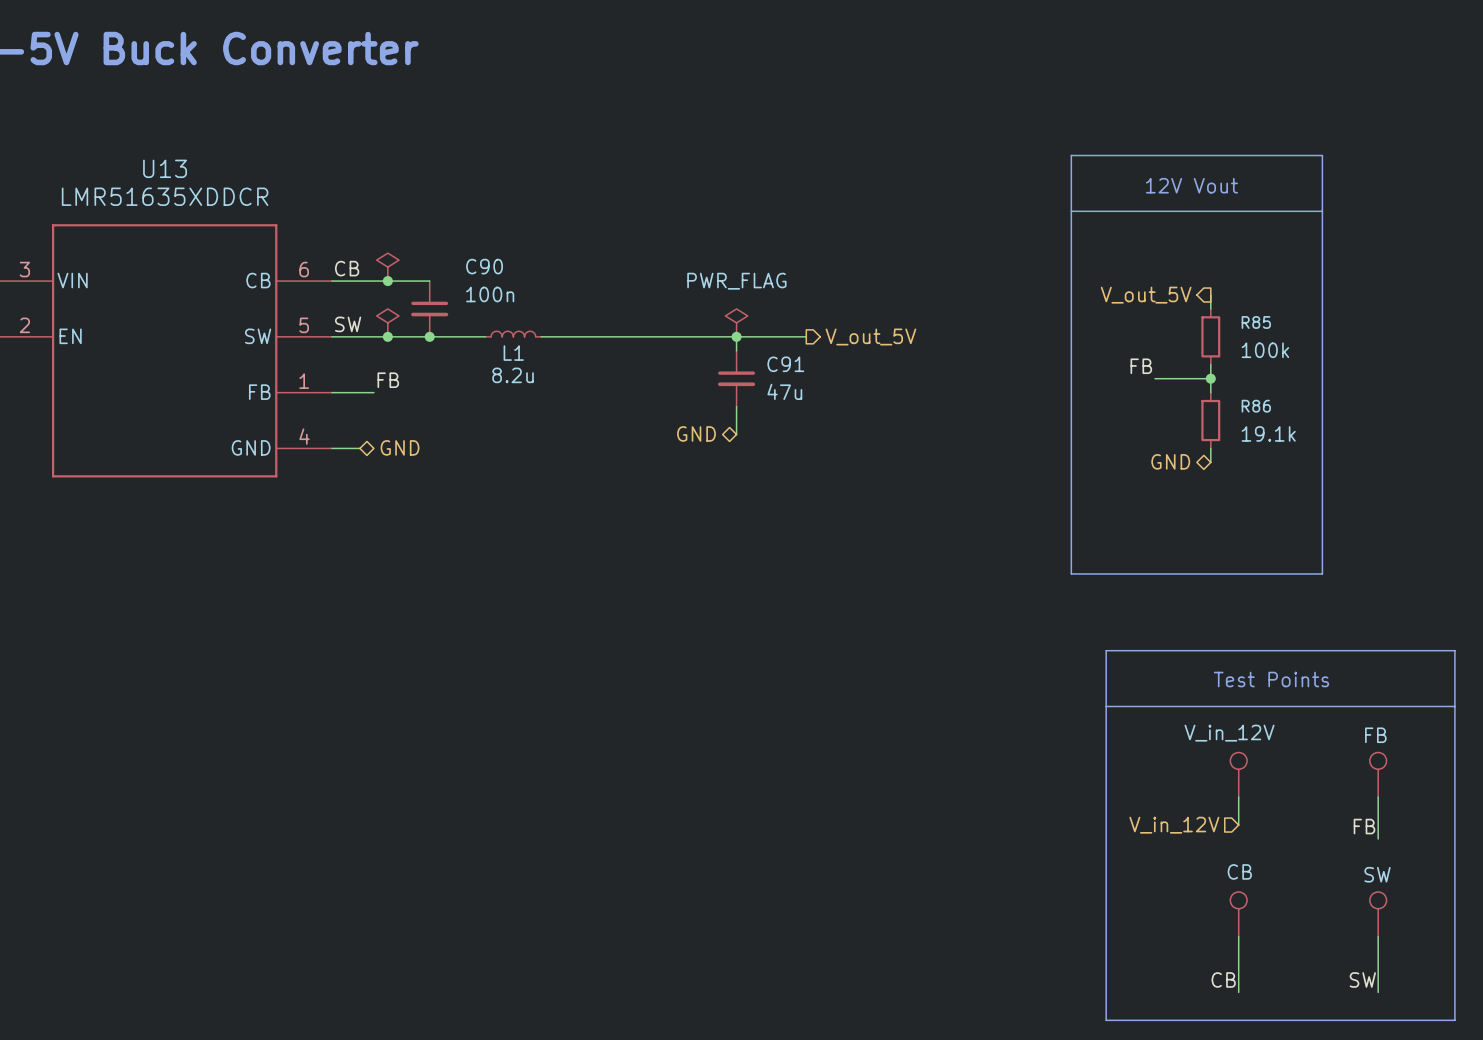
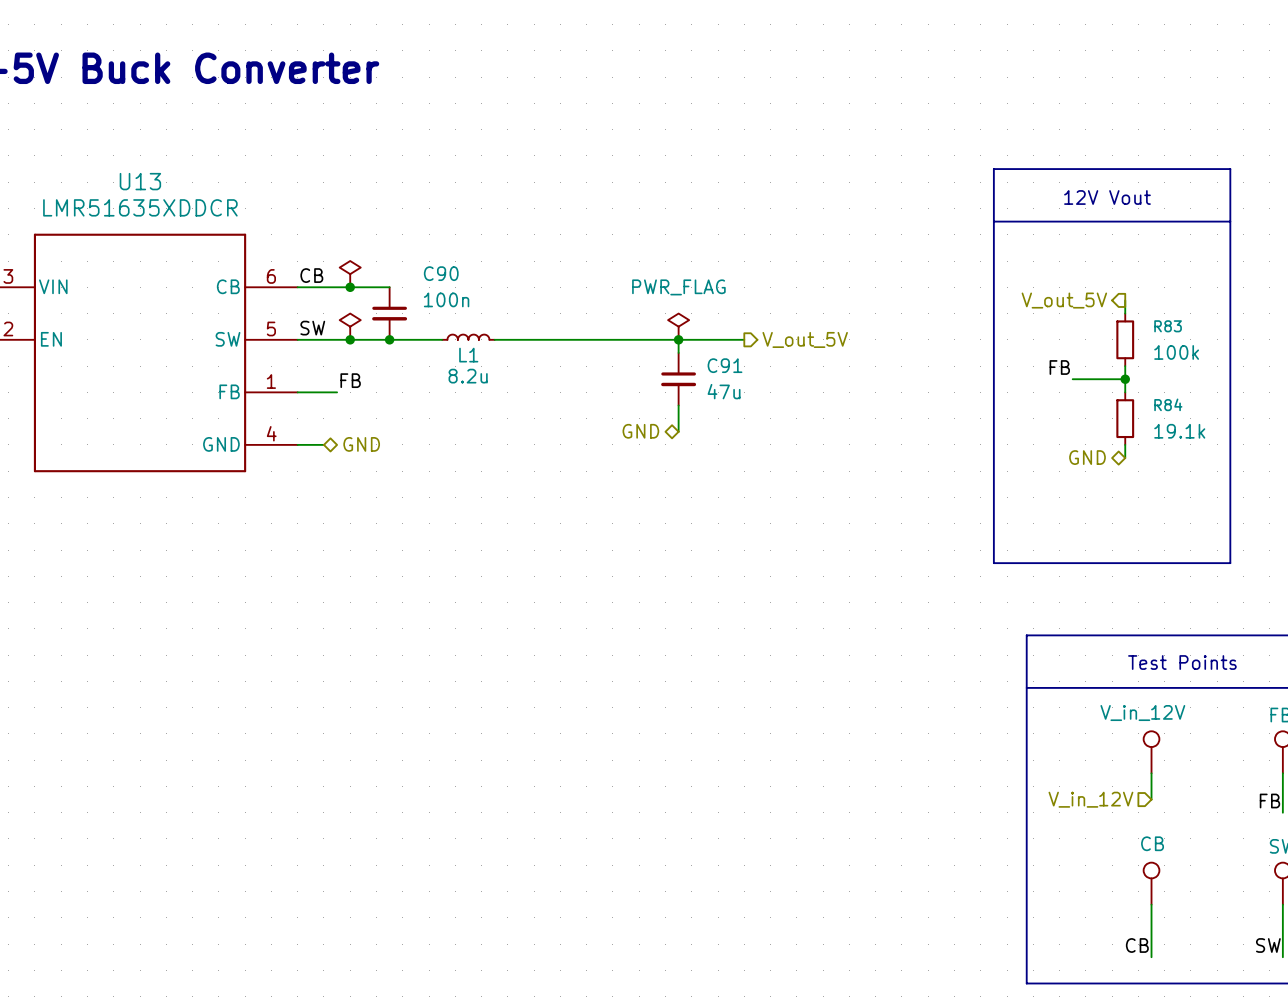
R85 name: R85 (1256, 322) -> R83 (1168, 326)
R86 name: R86 (1256, 406) -> R84 (1168, 404)

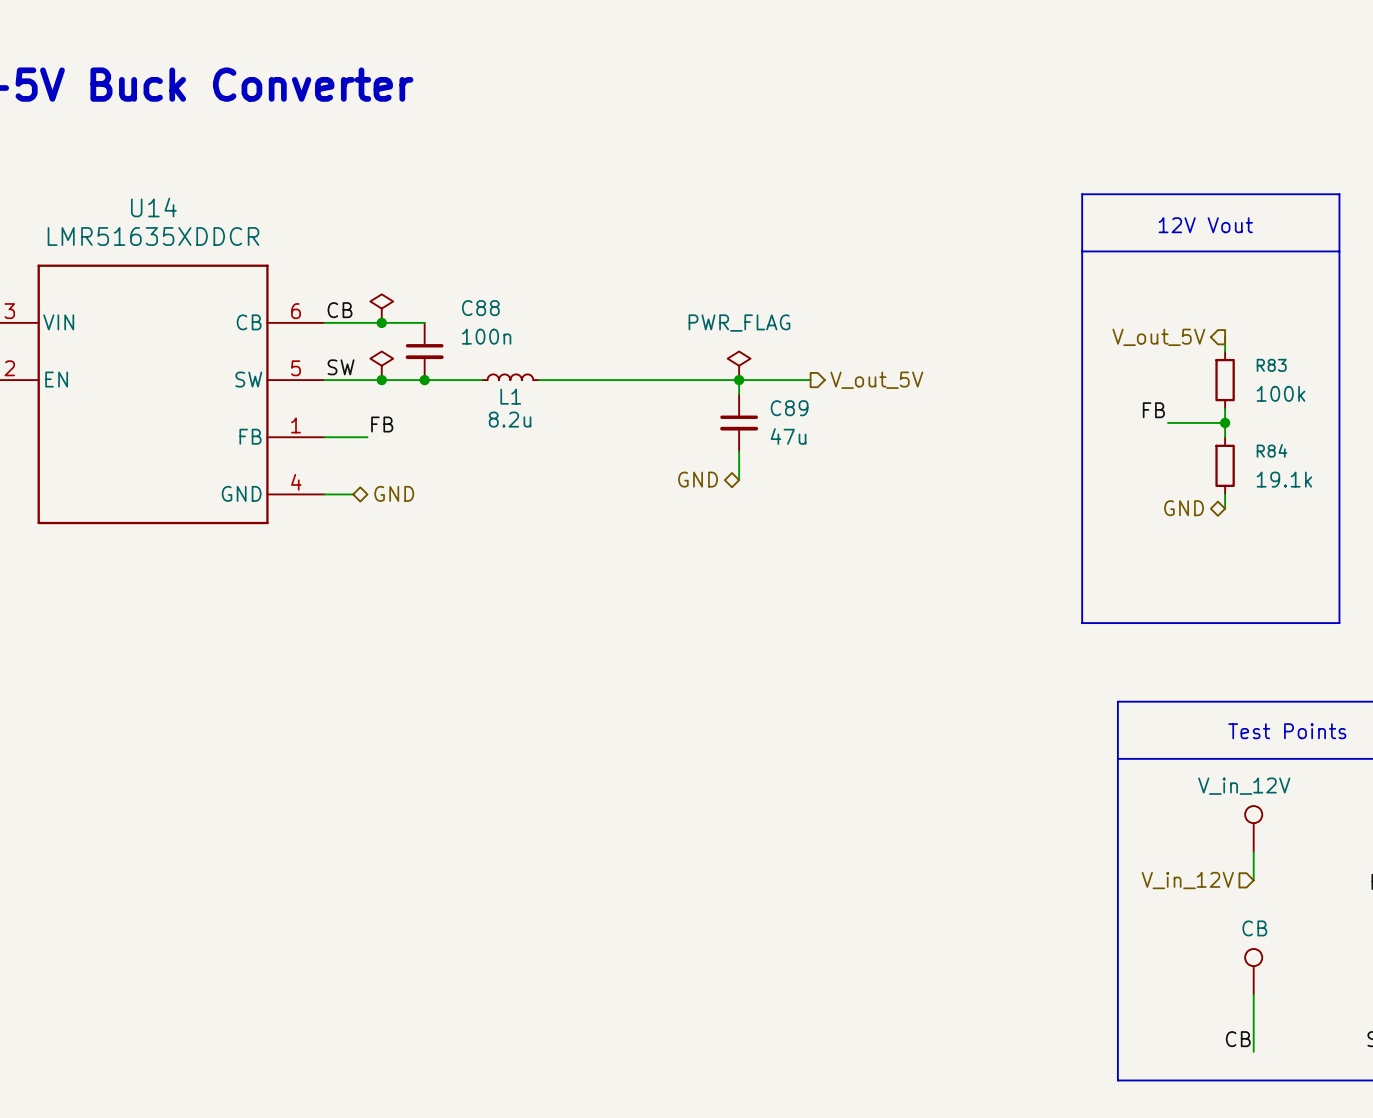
U13 name: U13 (140, 181) -> U14 (153, 207)
C90 name: C90 (441, 273) -> C88 (480, 308)
C91 name: C91 (725, 365) -> C89 (789, 408)

